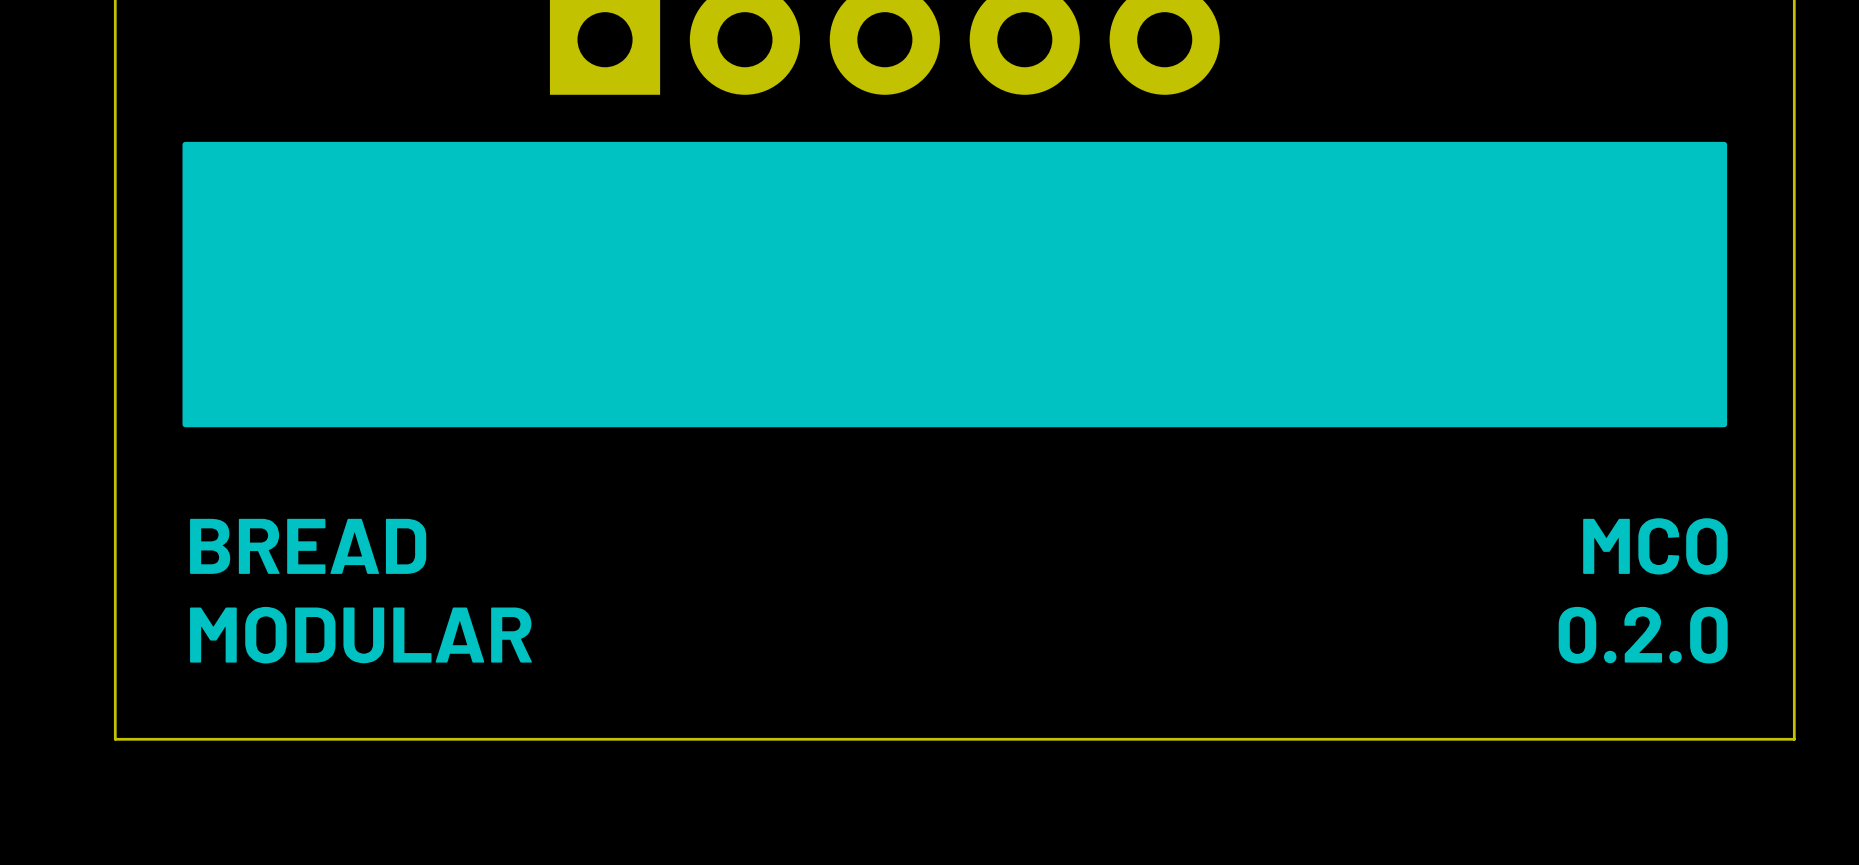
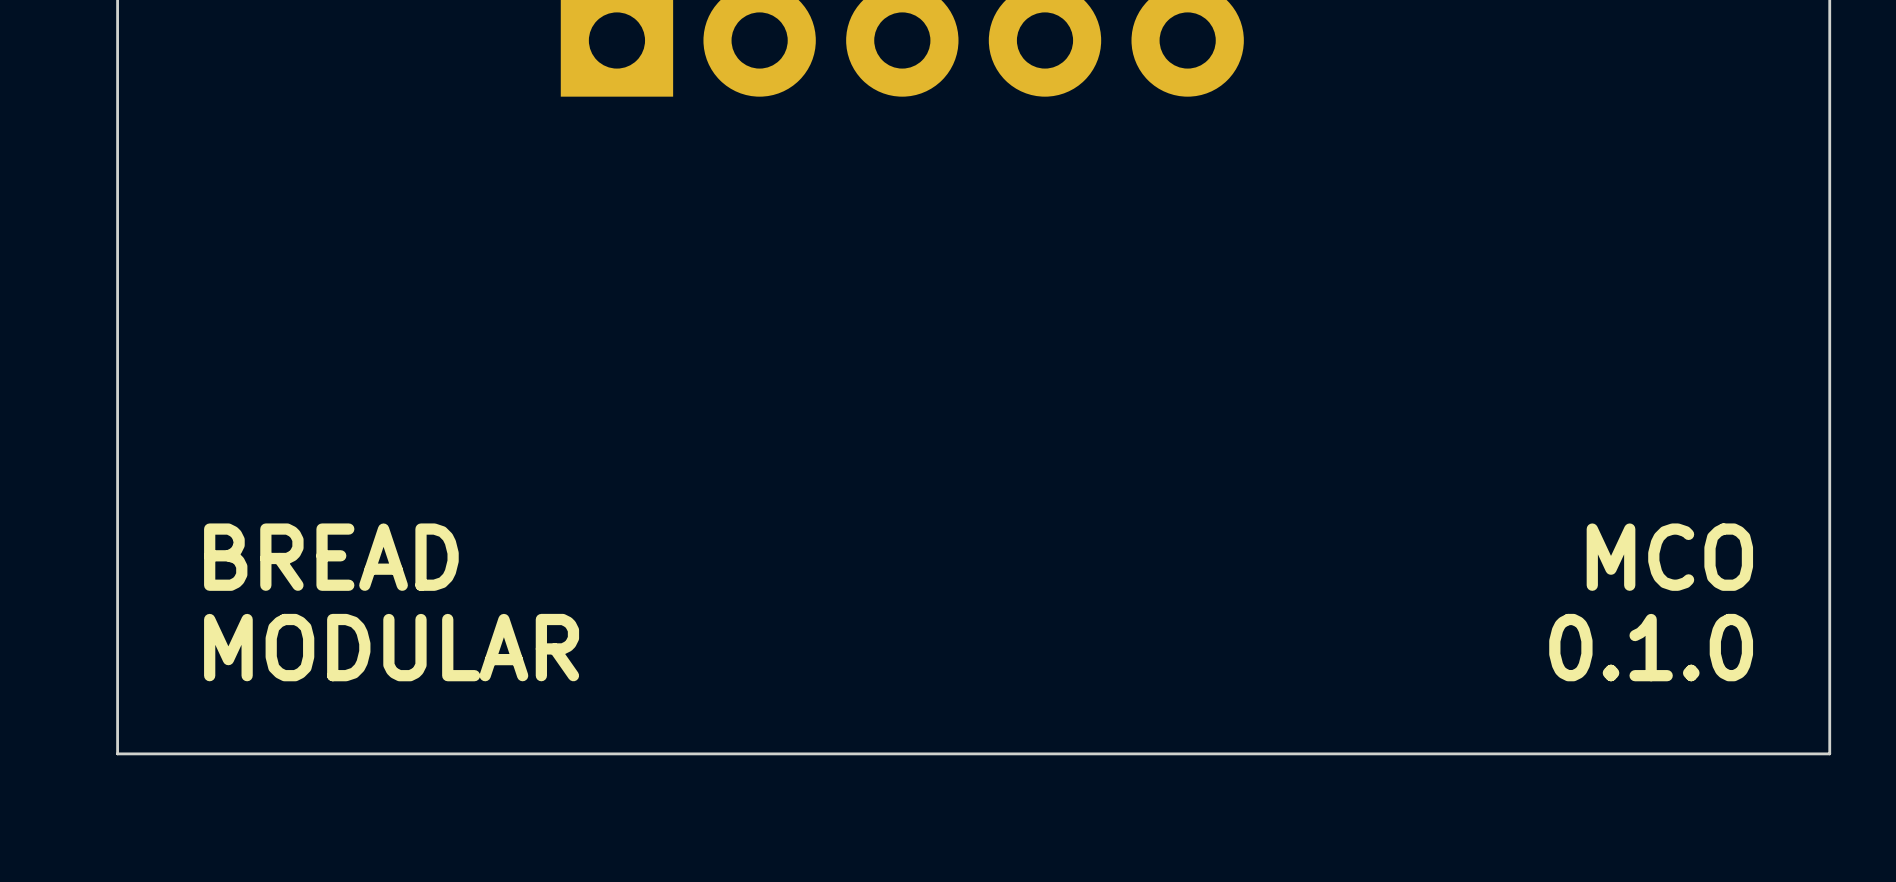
drawing: [182, 141, 1728, 428] -> none
text: 0.2.0 (1643, 635) -> 0.1.0 (1651, 647)

